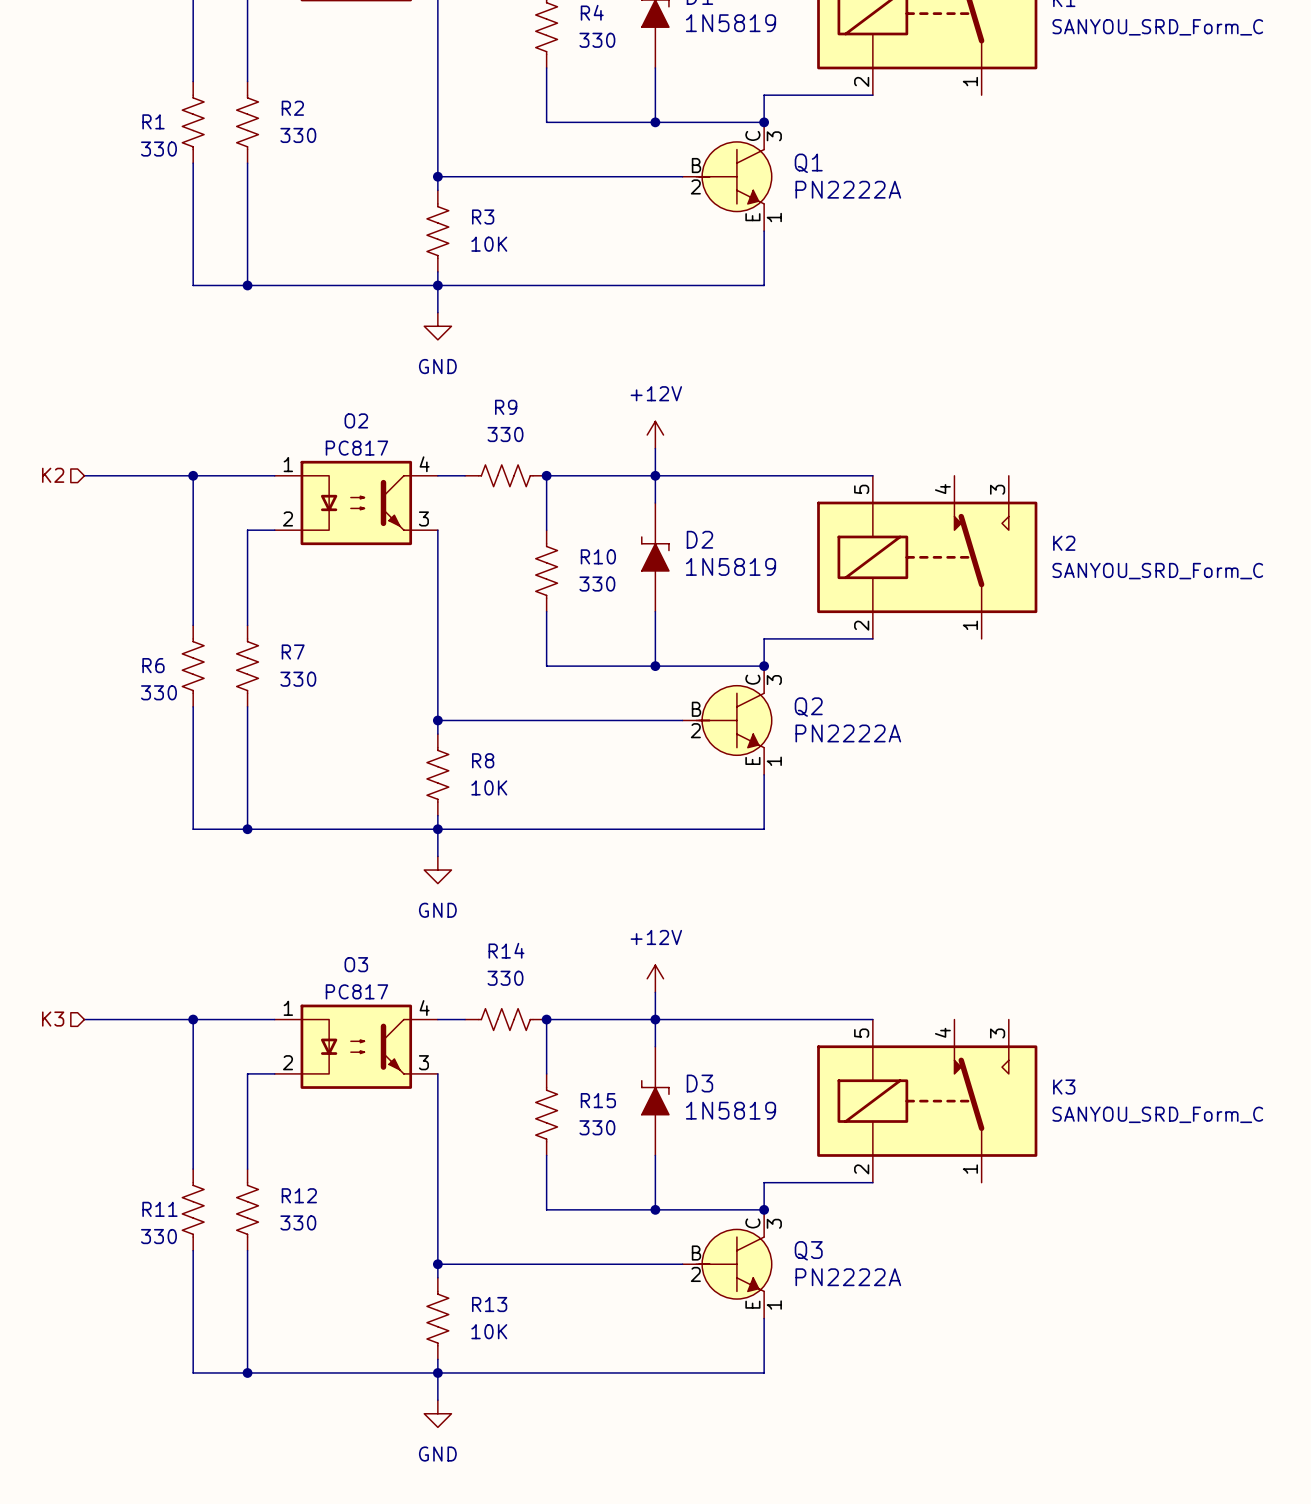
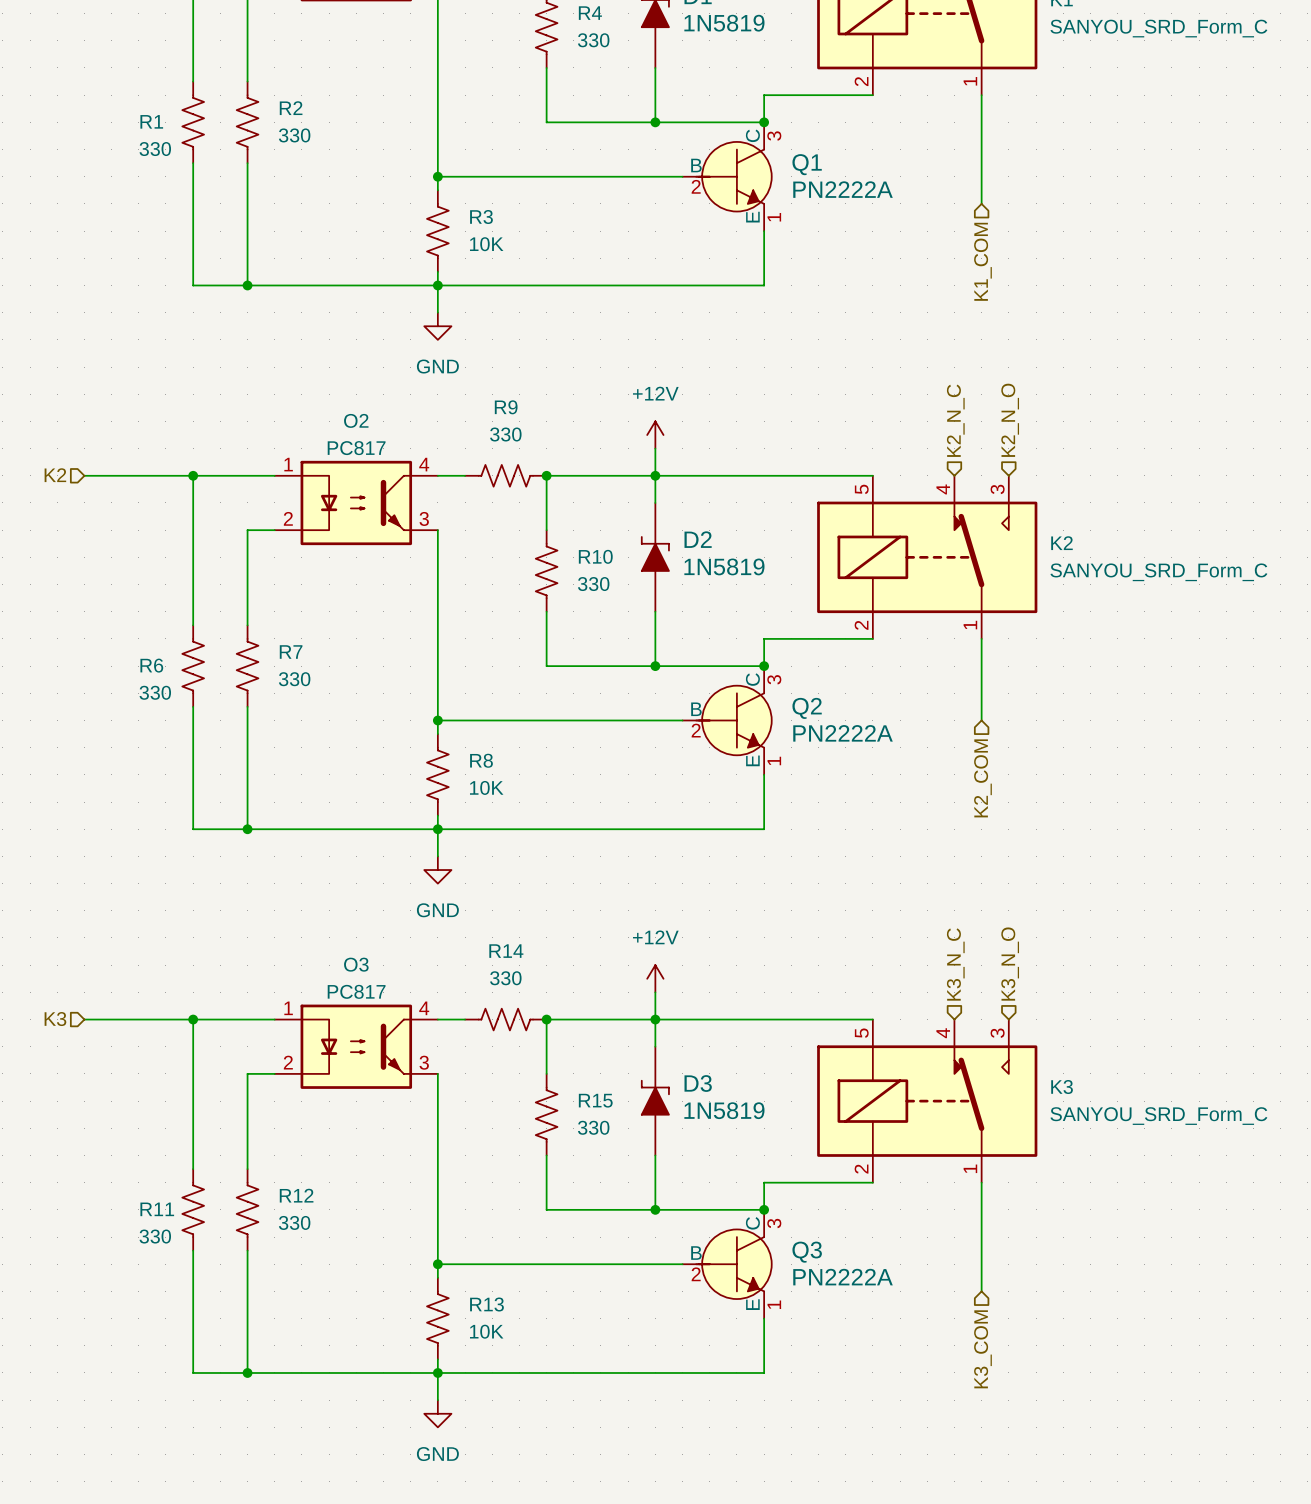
wire: none -> (981, 95) (981, 203)
hierarchical label: none -> K1_COM (982, 261)
hierarchical label: none -> K2_N_C (955, 420)
hierarchical label: none -> K2_N_O (1010, 420)
wire: none -> (981, 638) (981, 720)
hierarchical label: none -> K2_COM (982, 778)
hierarchical label: none -> K3_N_C (955, 964)
hierarchical label: none -> K3_N_O (1010, 964)
wire: none -> (981, 1182) (981, 1291)
hierarchical label: none -> K3_COM (982, 1349)

